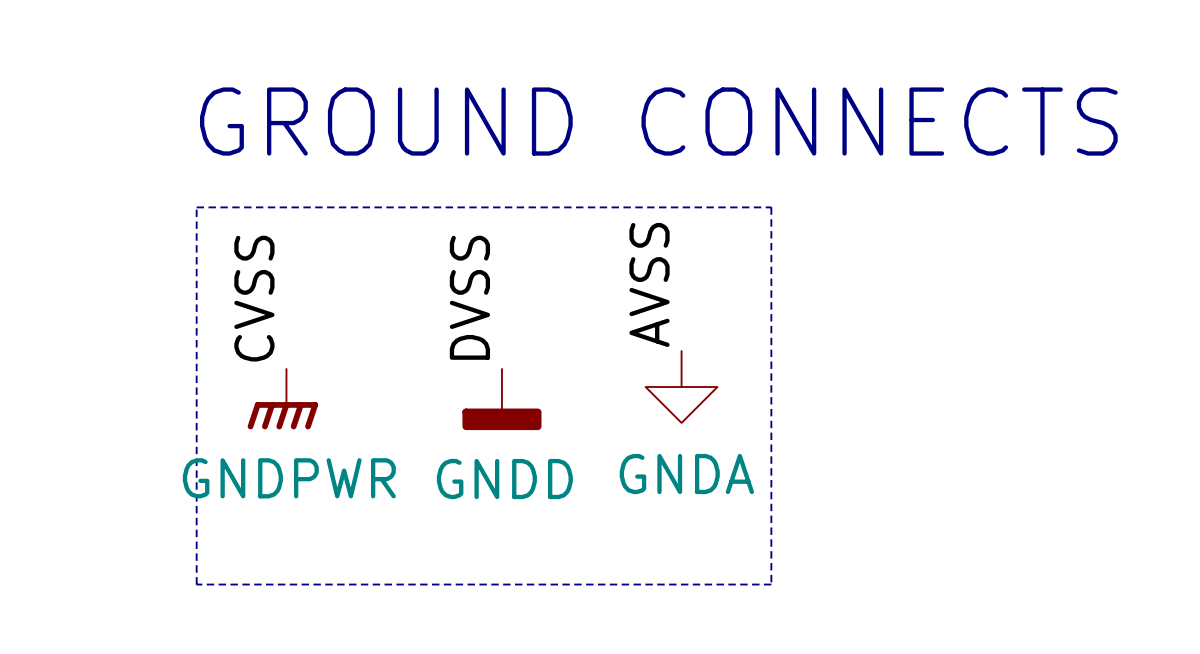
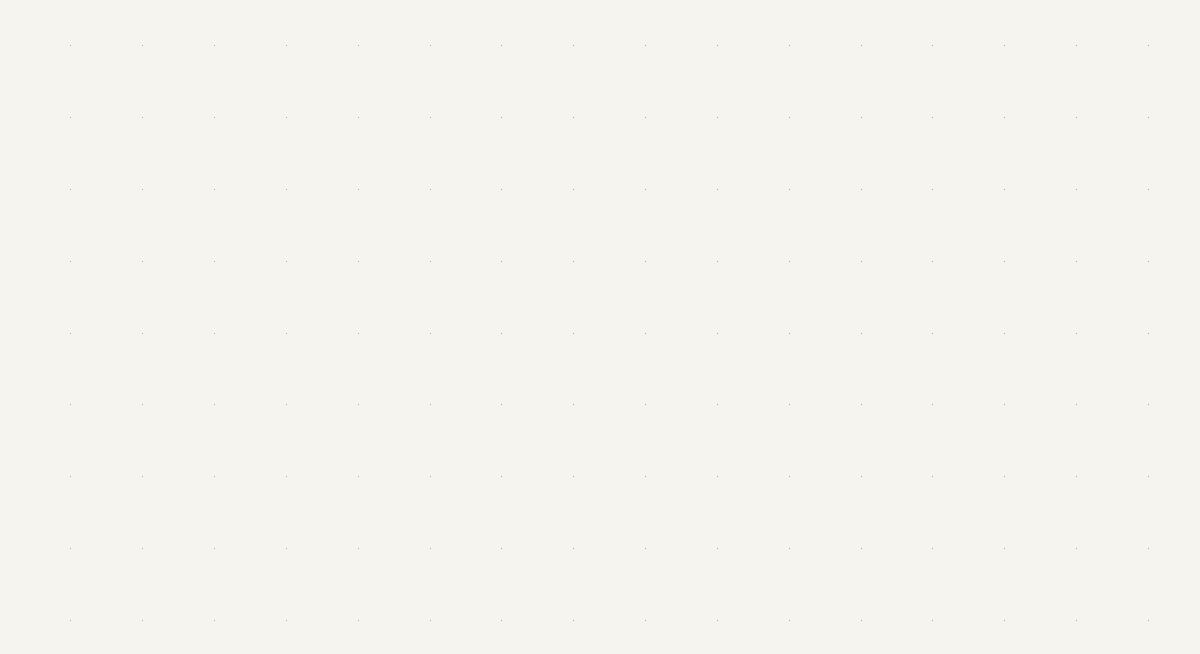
text: GROUND CONNECTS (658, 121) -> none
line: (196, 207) (771, 207) (771, 584) (196, 584) (196, 207) -> none
label: AVSS (649, 284) -> none
label: DVSS (469, 297) -> none
label: CVSS (254, 298) -> none
power symbol: GNDA (681, 386) -> none
power symbol: GNDPWR (282, 399) -> none
power symbol: GNDD (501, 399) -> none

